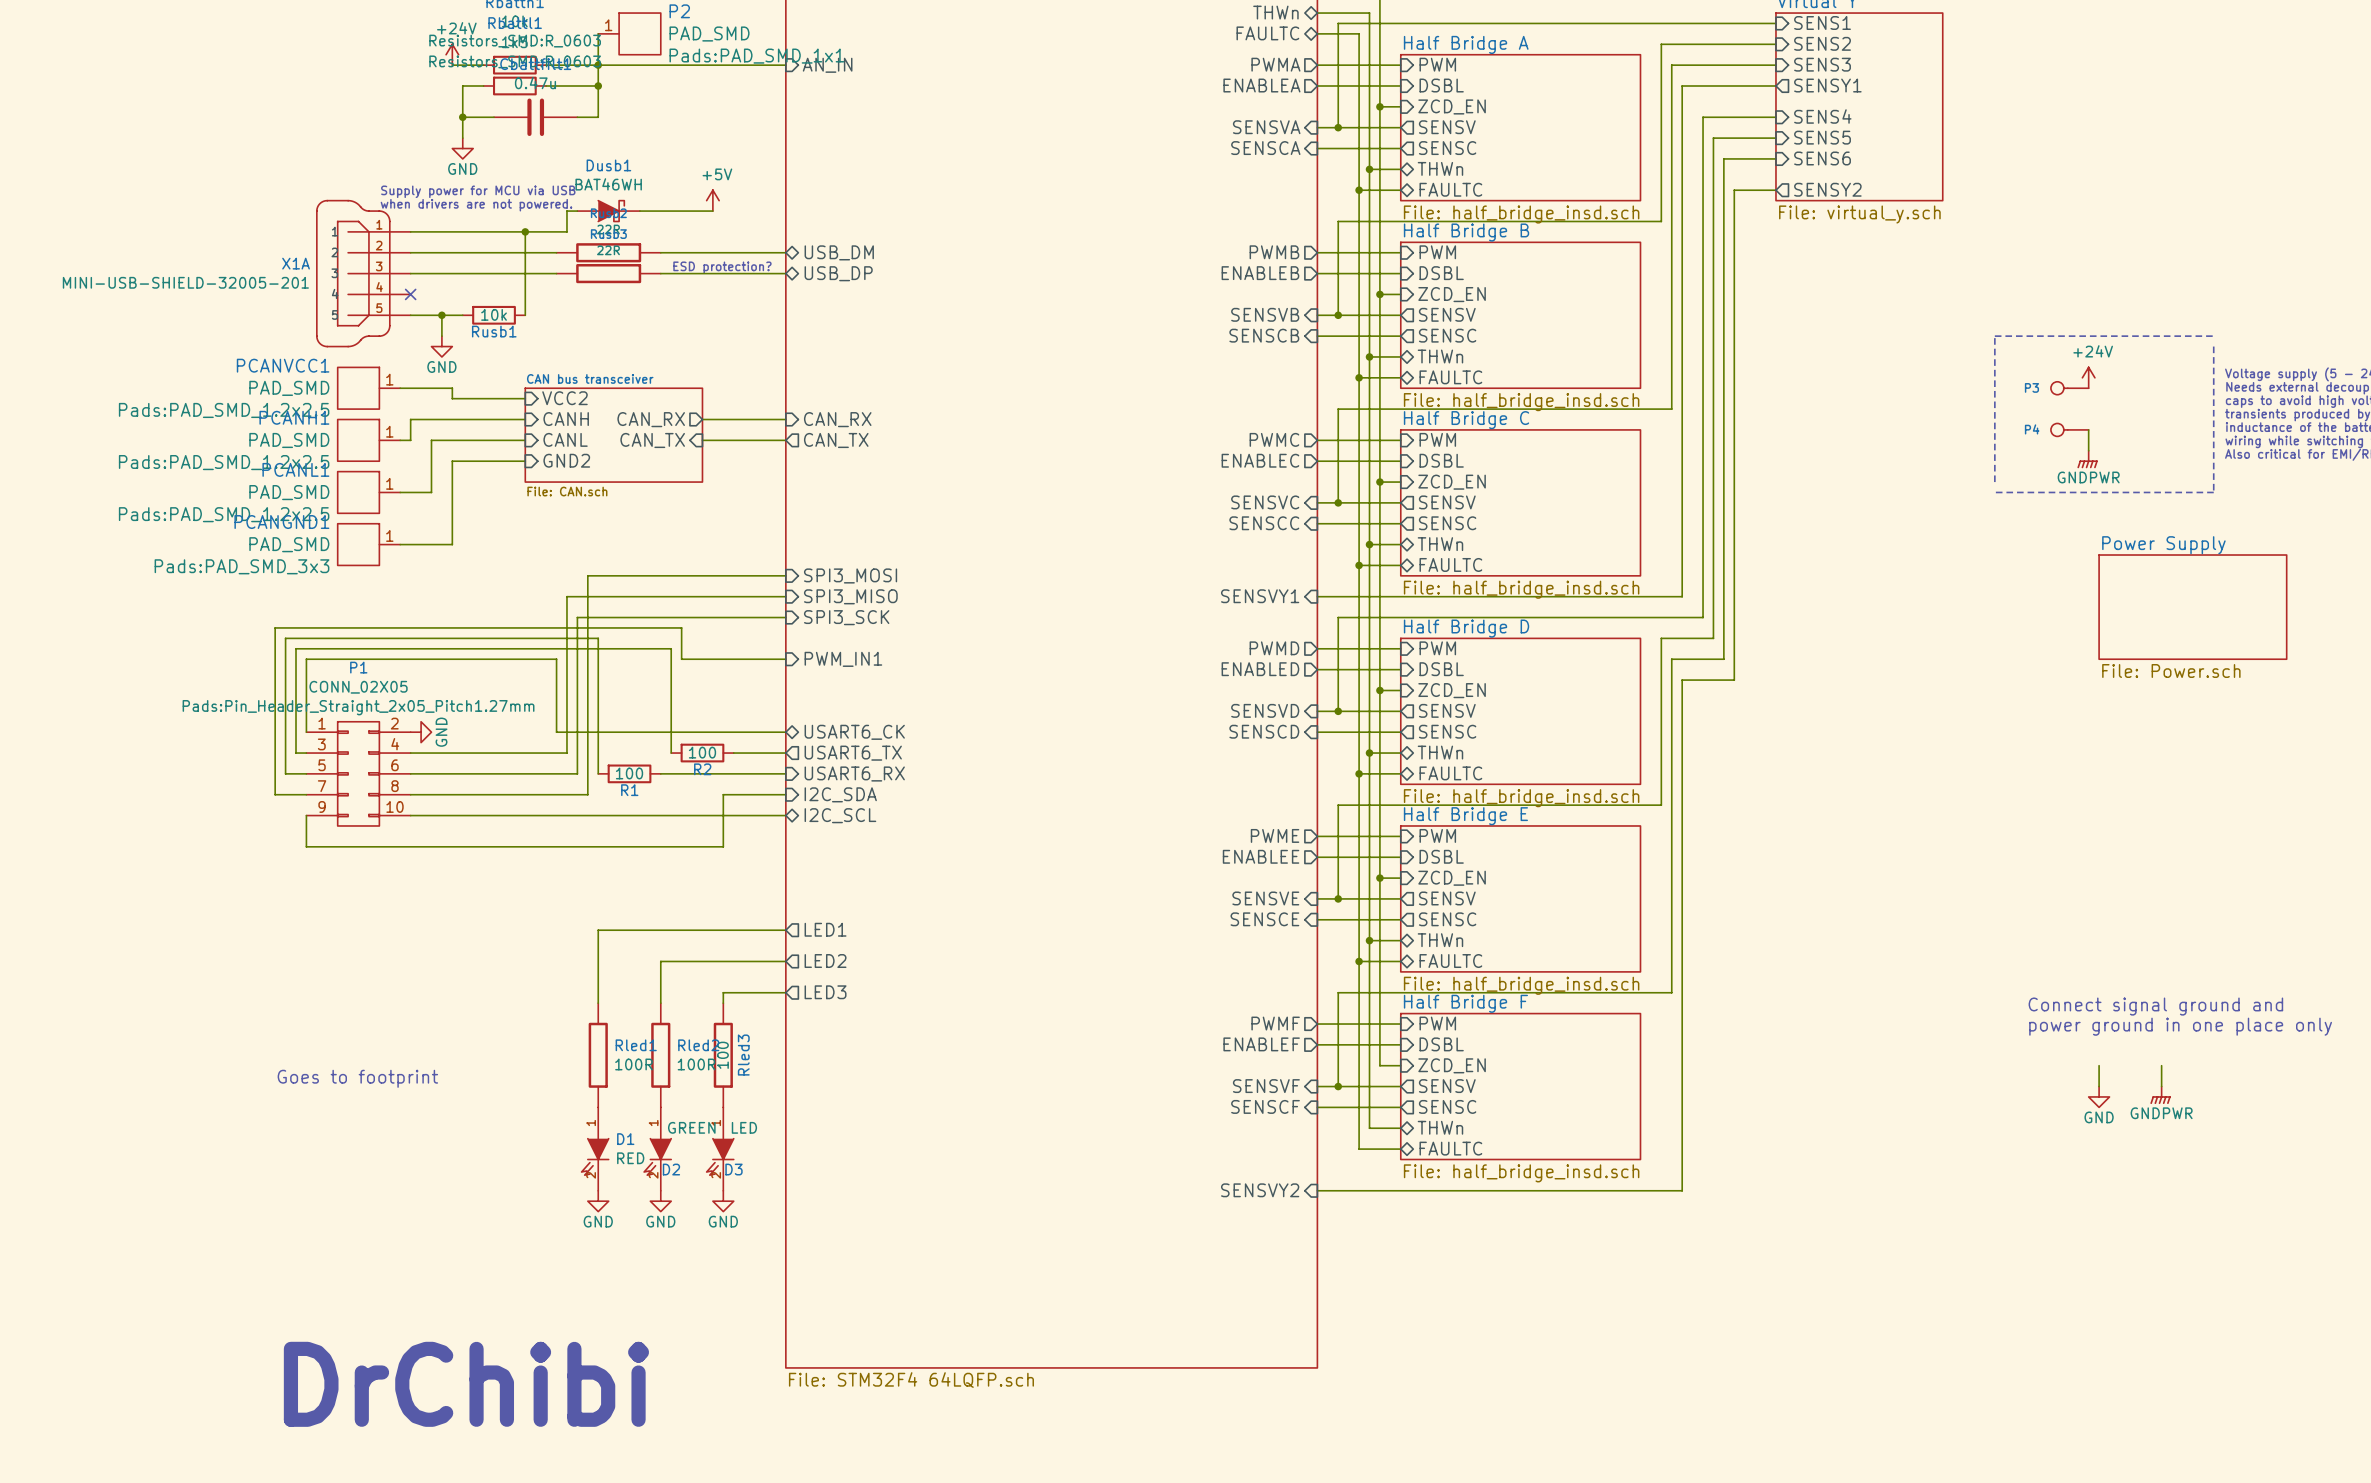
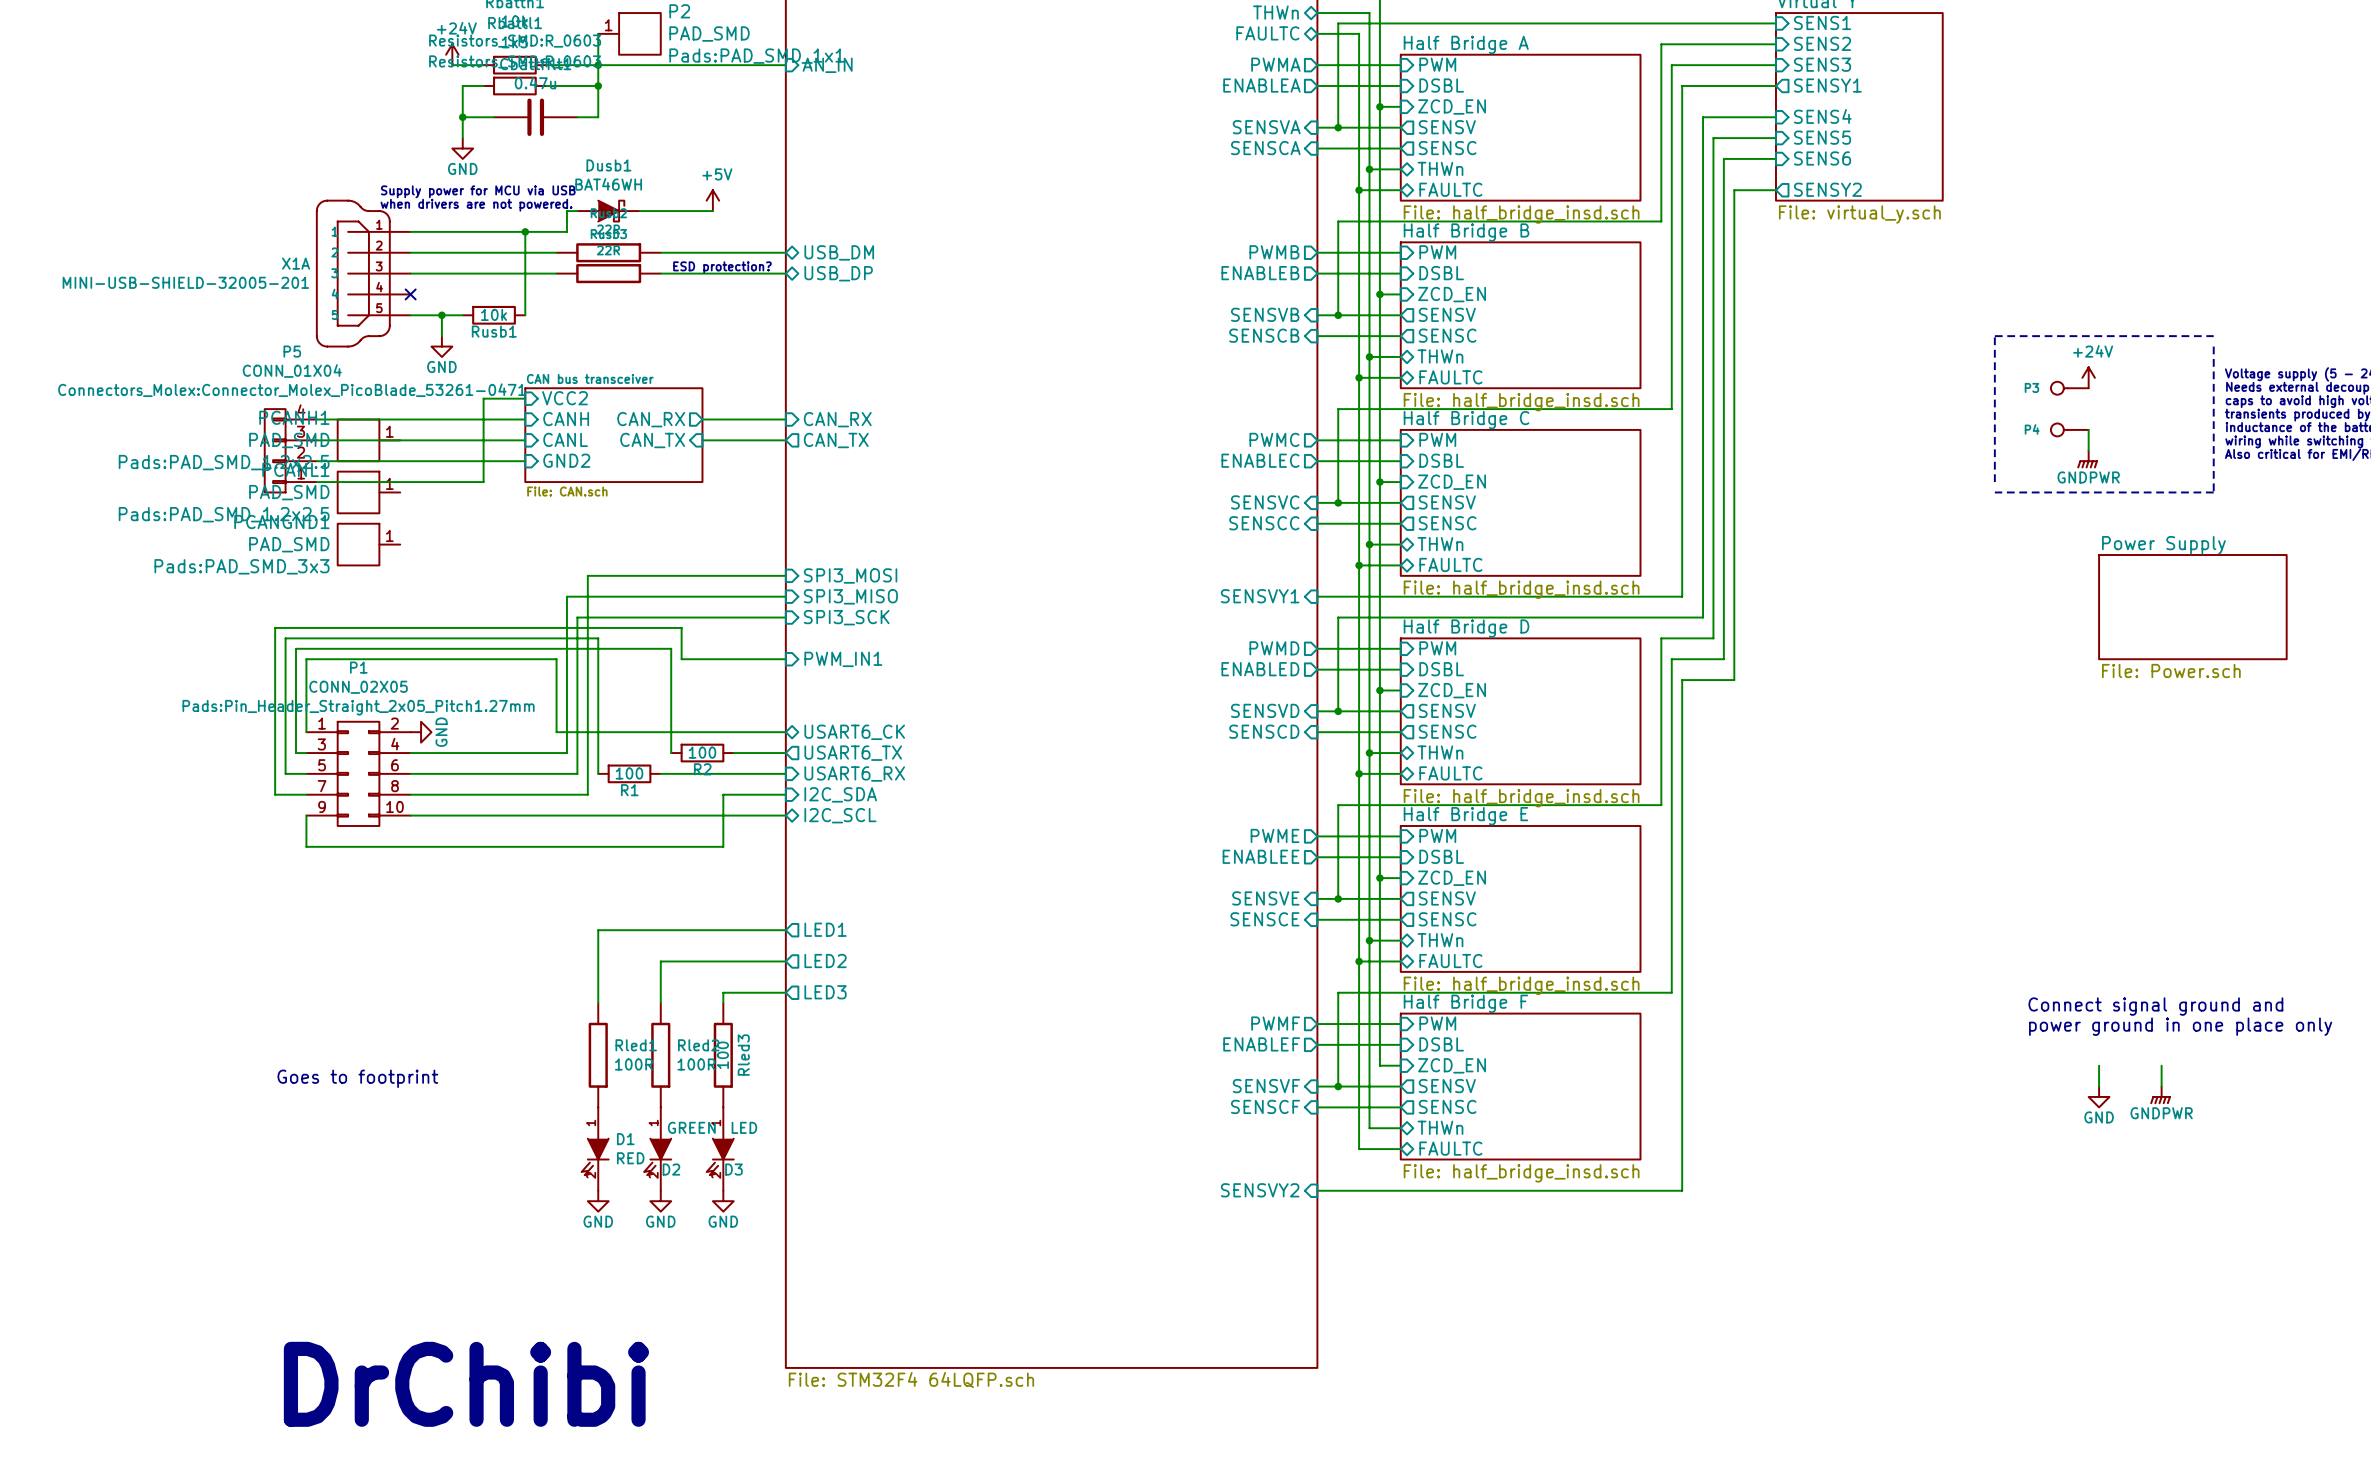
PCANVCC1: PAD_SMD (368, 388) -> none
wire: (400, 388) (452, 388) (452, 398) (483, 398) -> (316, 482) (483, 482) (483, 398)
wire: none -> (316, 419) (410, 419)
wire: (410, 419) (410, 440) -> (431, 440) (410, 440)
wire: none -> (316, 440) (400, 440)
wire: (431, 440) (431, 492) (400, 492) -> none
P5: none -> CONN_01X04 (290, 450)
wire: (452, 461) (452, 544) (400, 544) -> (452, 461) (316, 461)

